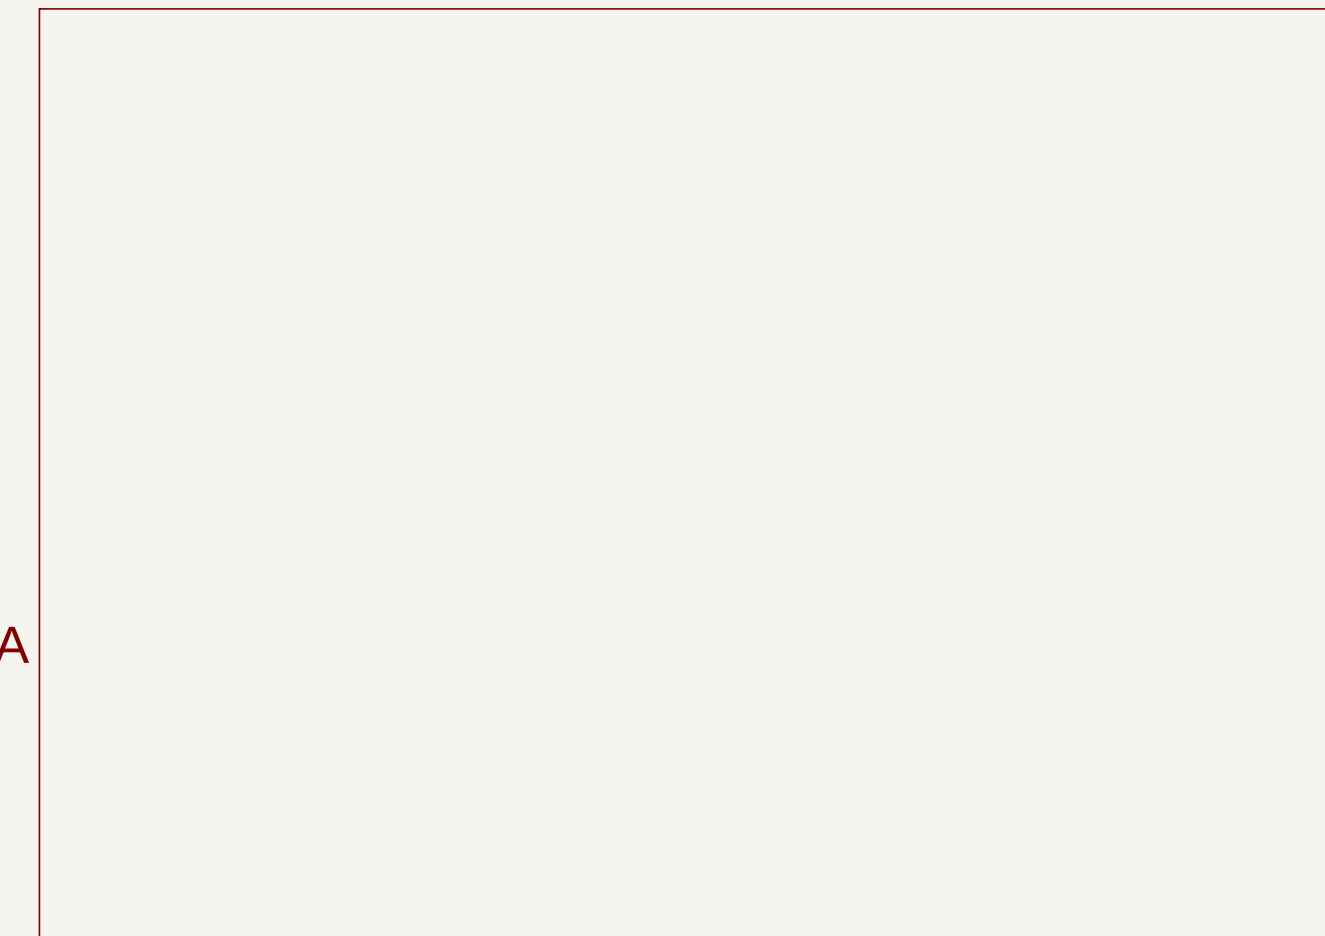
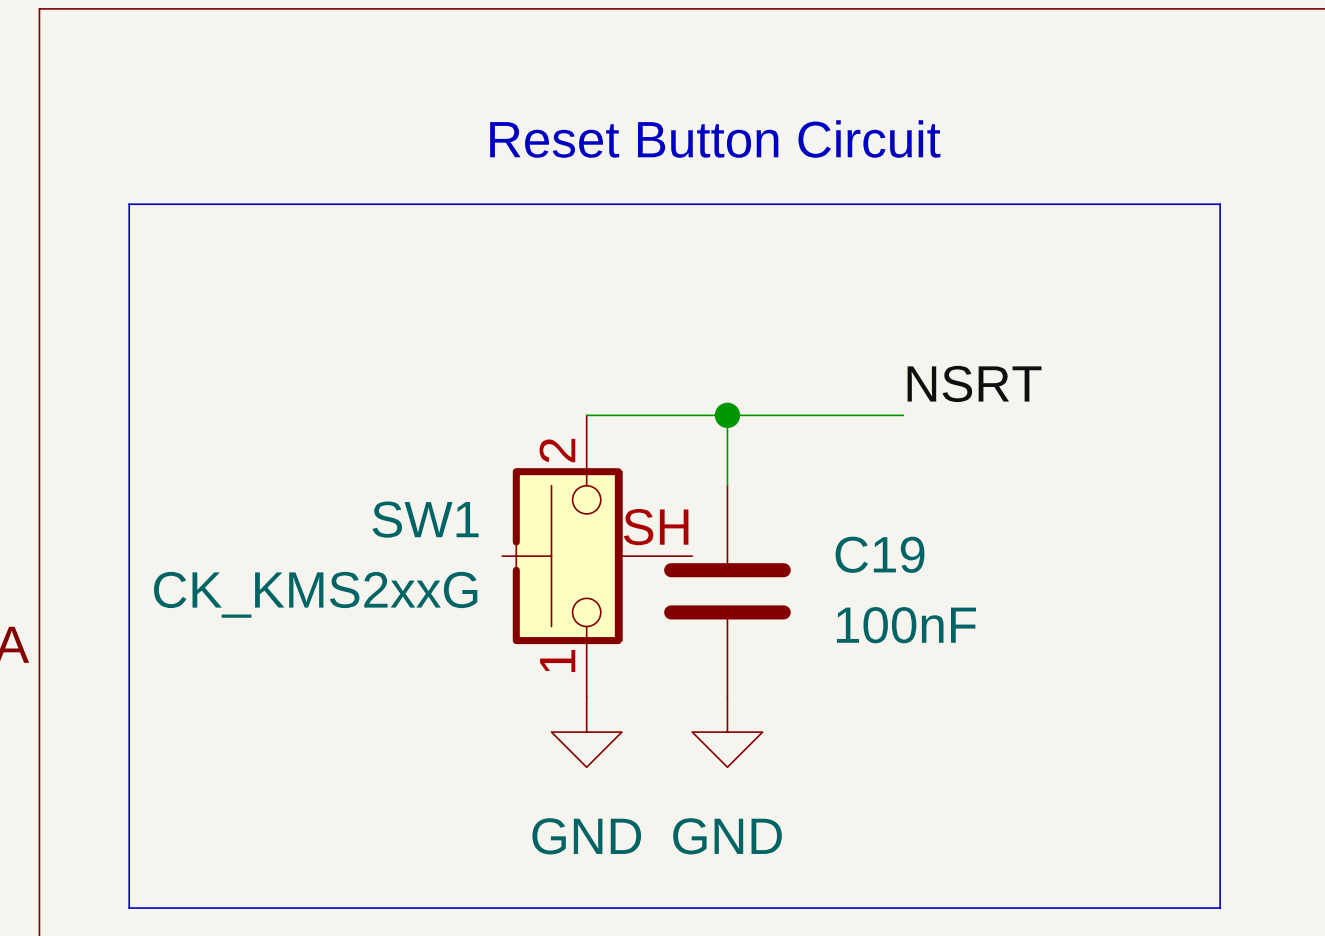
text: none -> Reset Button Circuit (715, 138)
line: none -> (129, 204) (1220, 204) (1220, 908) (129, 908) (129, 204)
label: none -> NSRT (974, 383)
wire: none -> (586, 415) (903, 415)
wire: none -> (727, 415) (727, 485)
junction: none -> (727, 415)
SW1: none -> CK_KMS2xxG (597, 556)
C19: none -> 100nF (727, 591)
power symbol: none -> GND (586, 732)
power symbol: none -> GND (727, 732)

